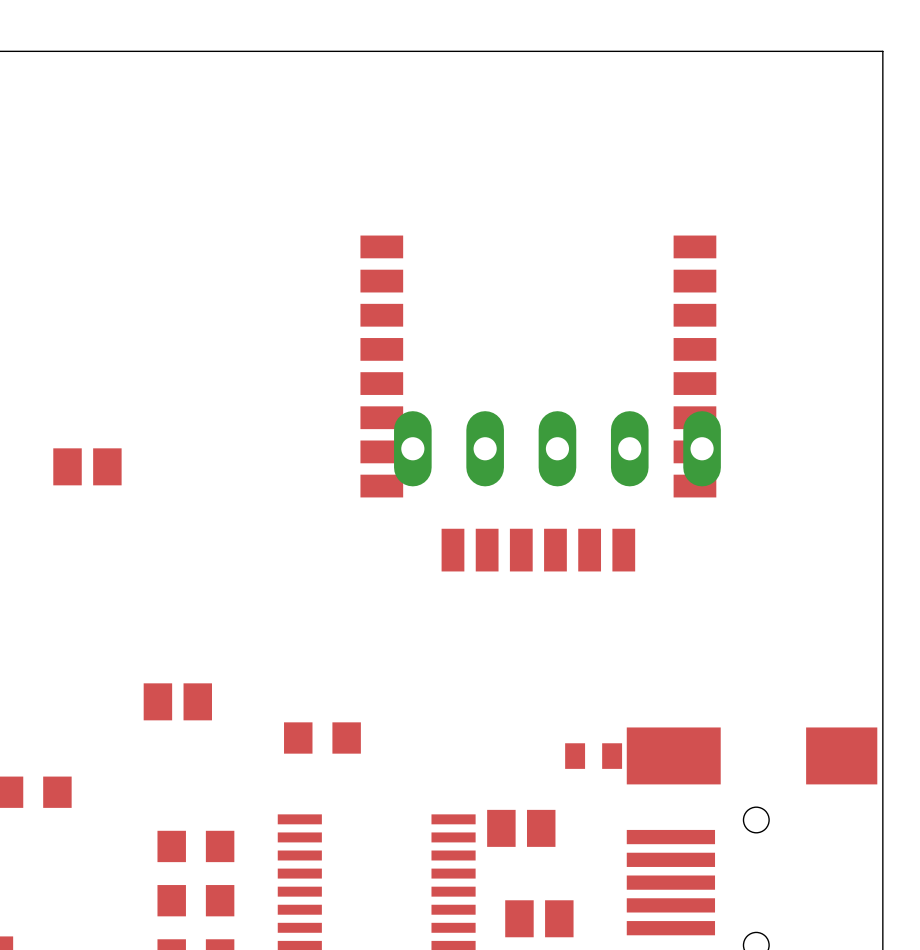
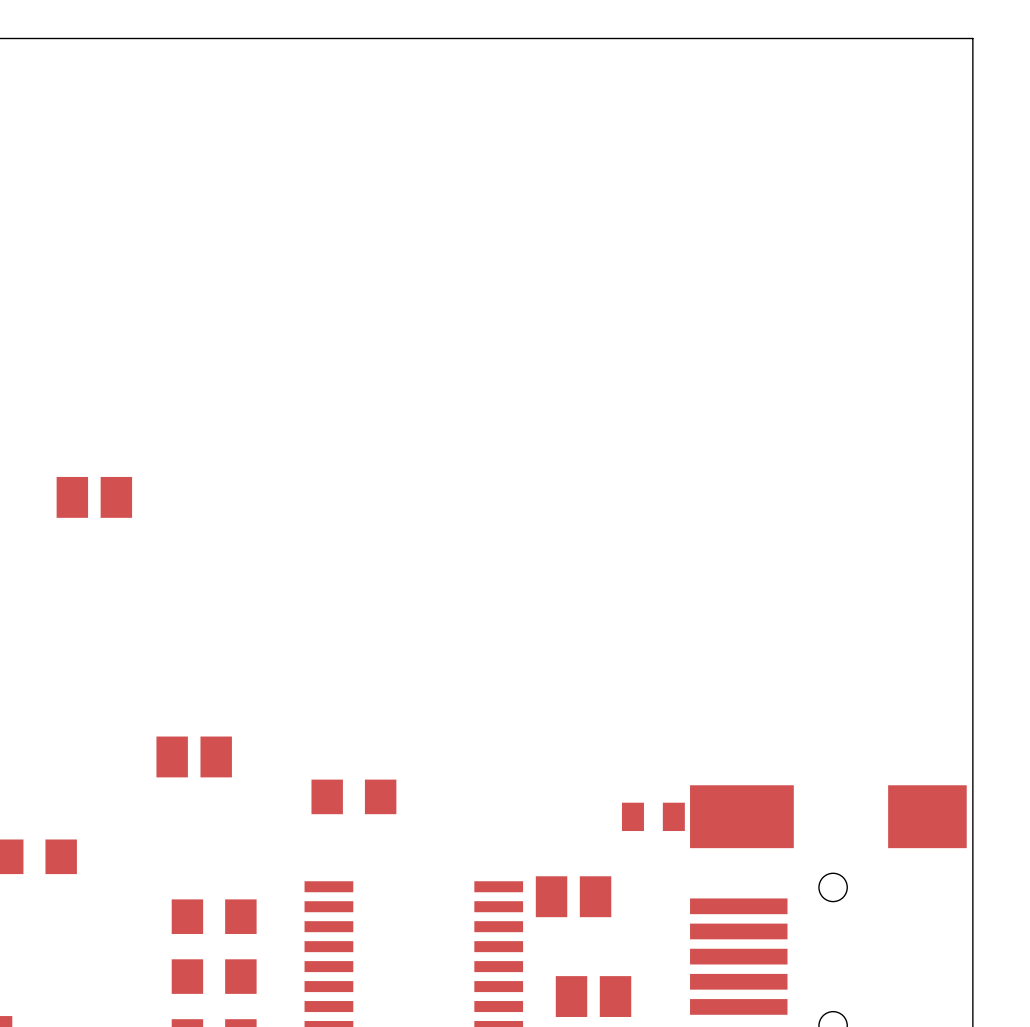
part: (538, 403) -> none
part: (557, 448) -> none

